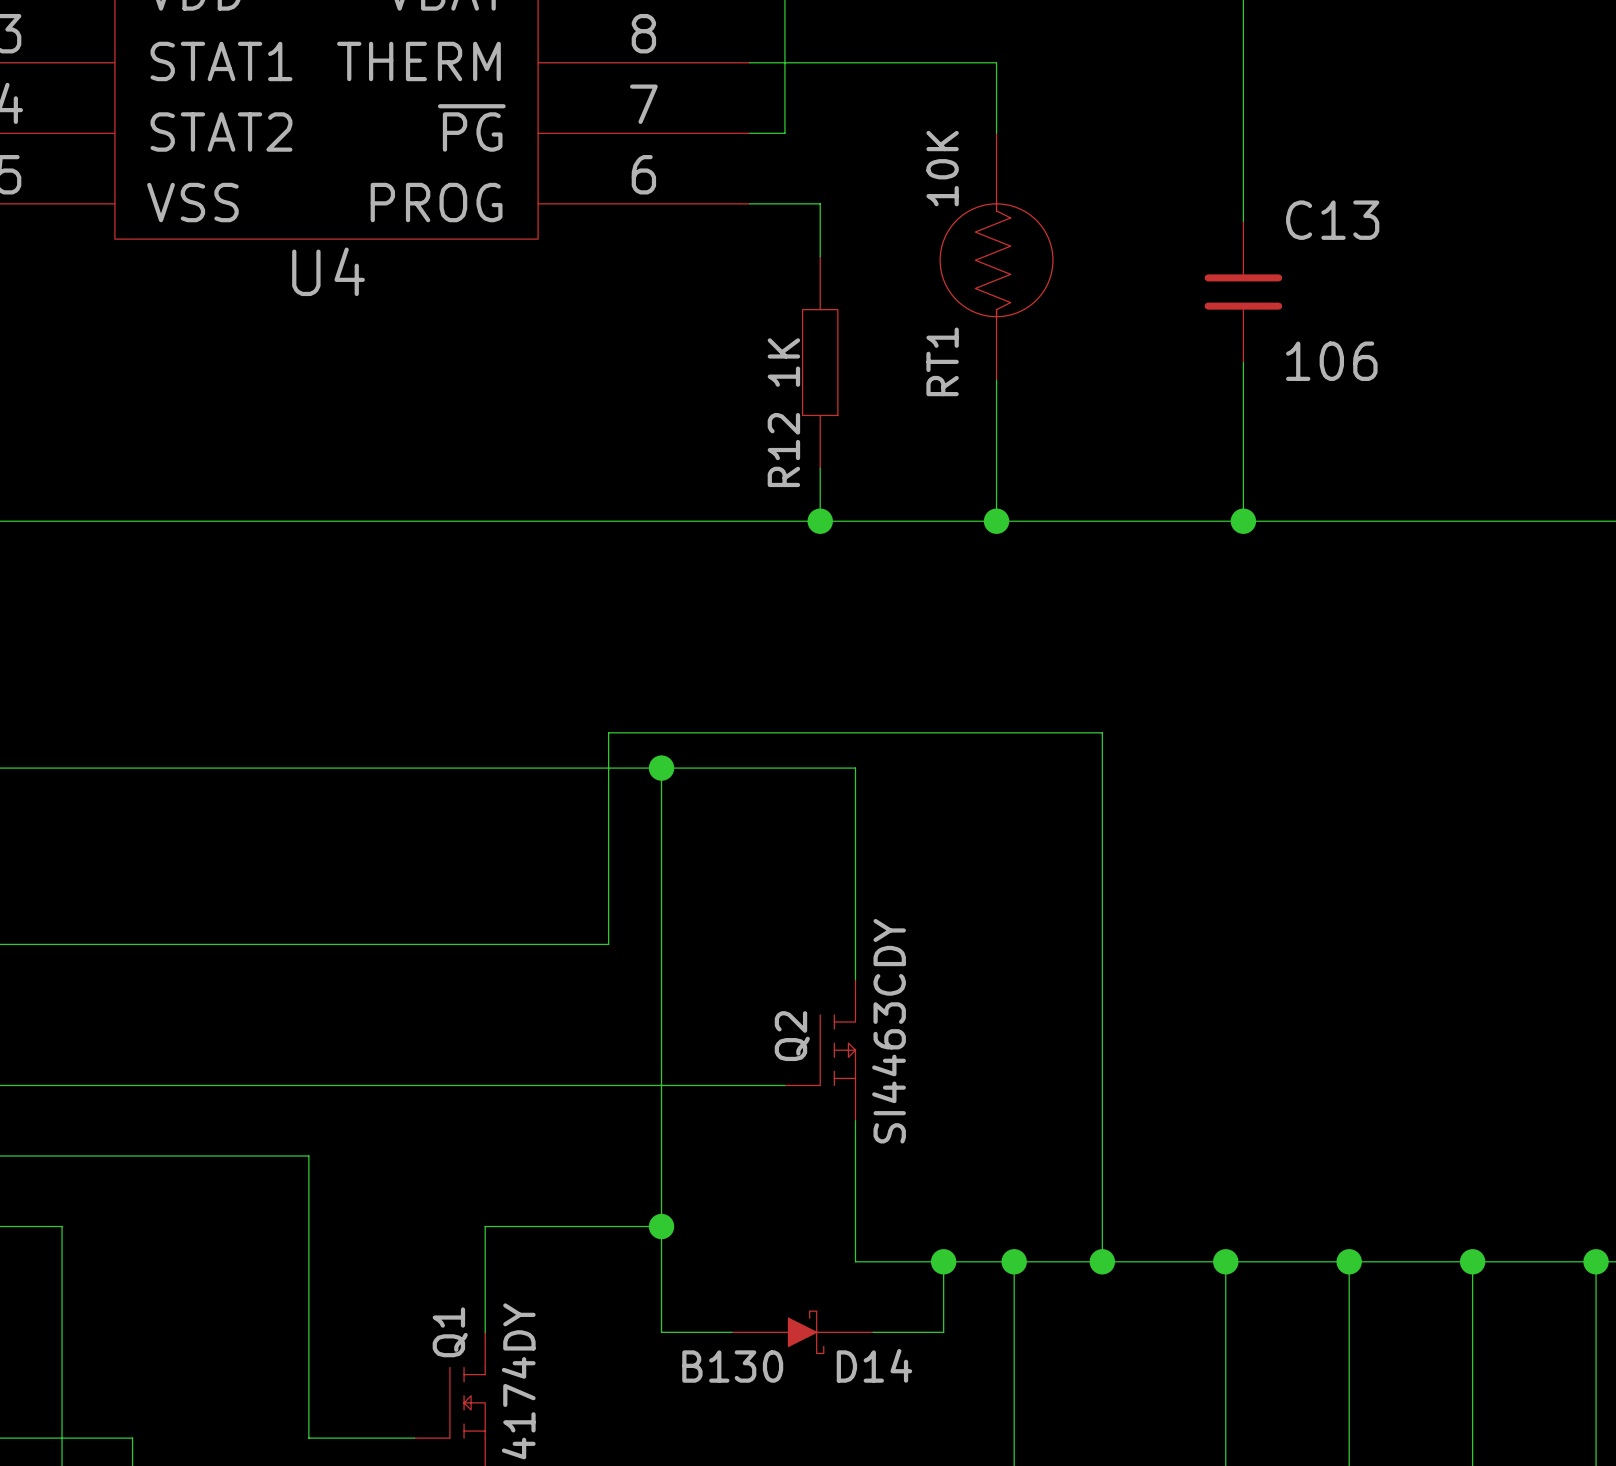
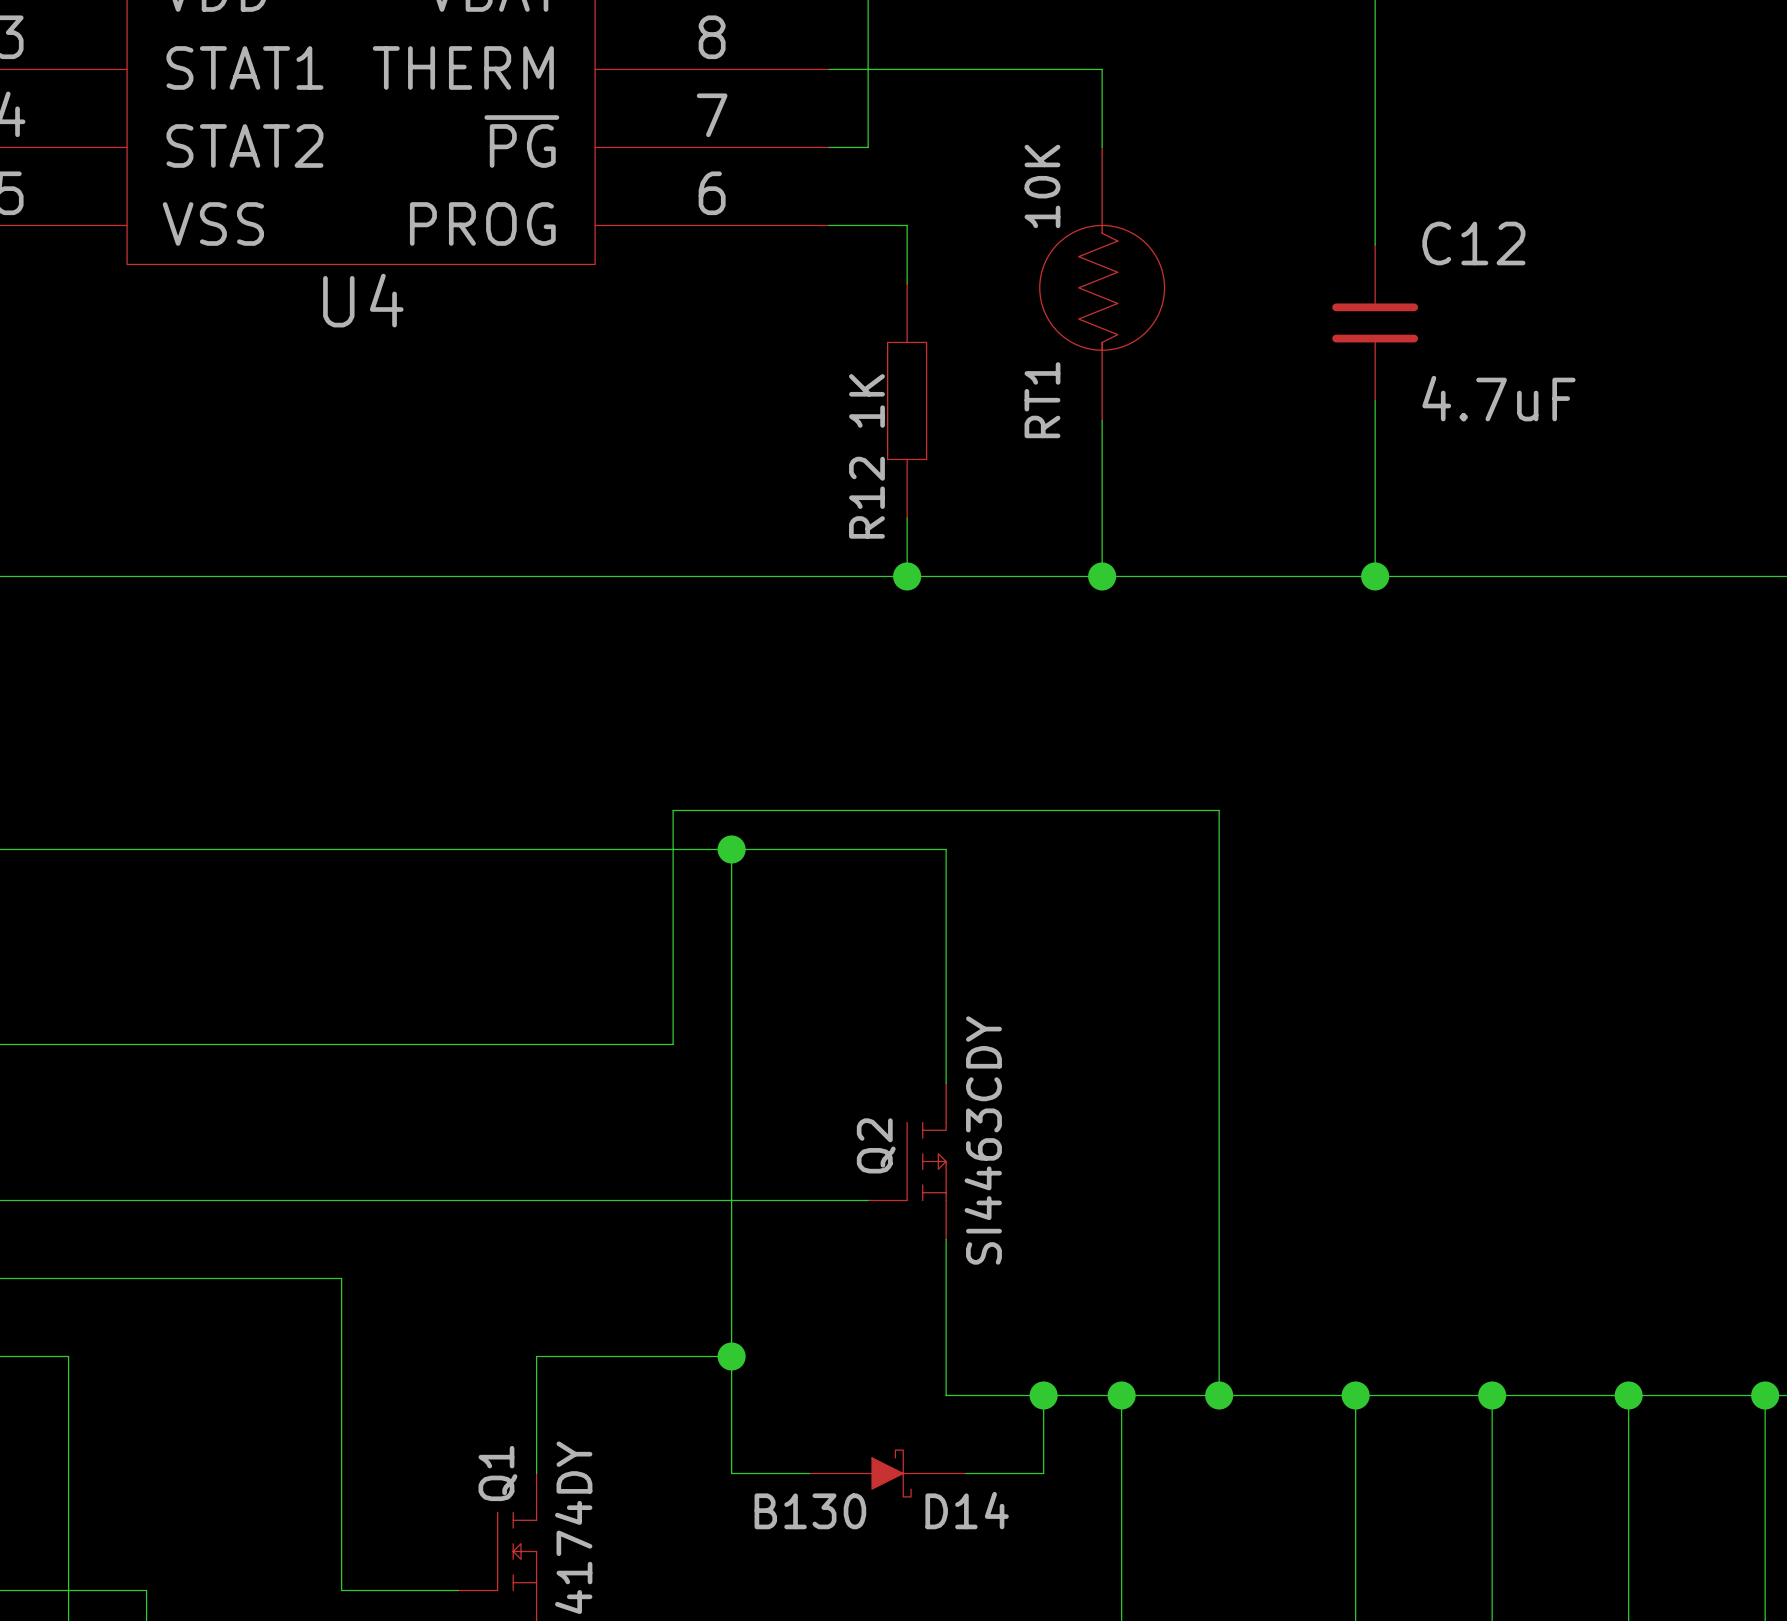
C13 name: C13 (1332, 220) -> C12 (1473, 243)
C13 value: 106 (1331, 361) -> 4.7uF (1498, 398)

